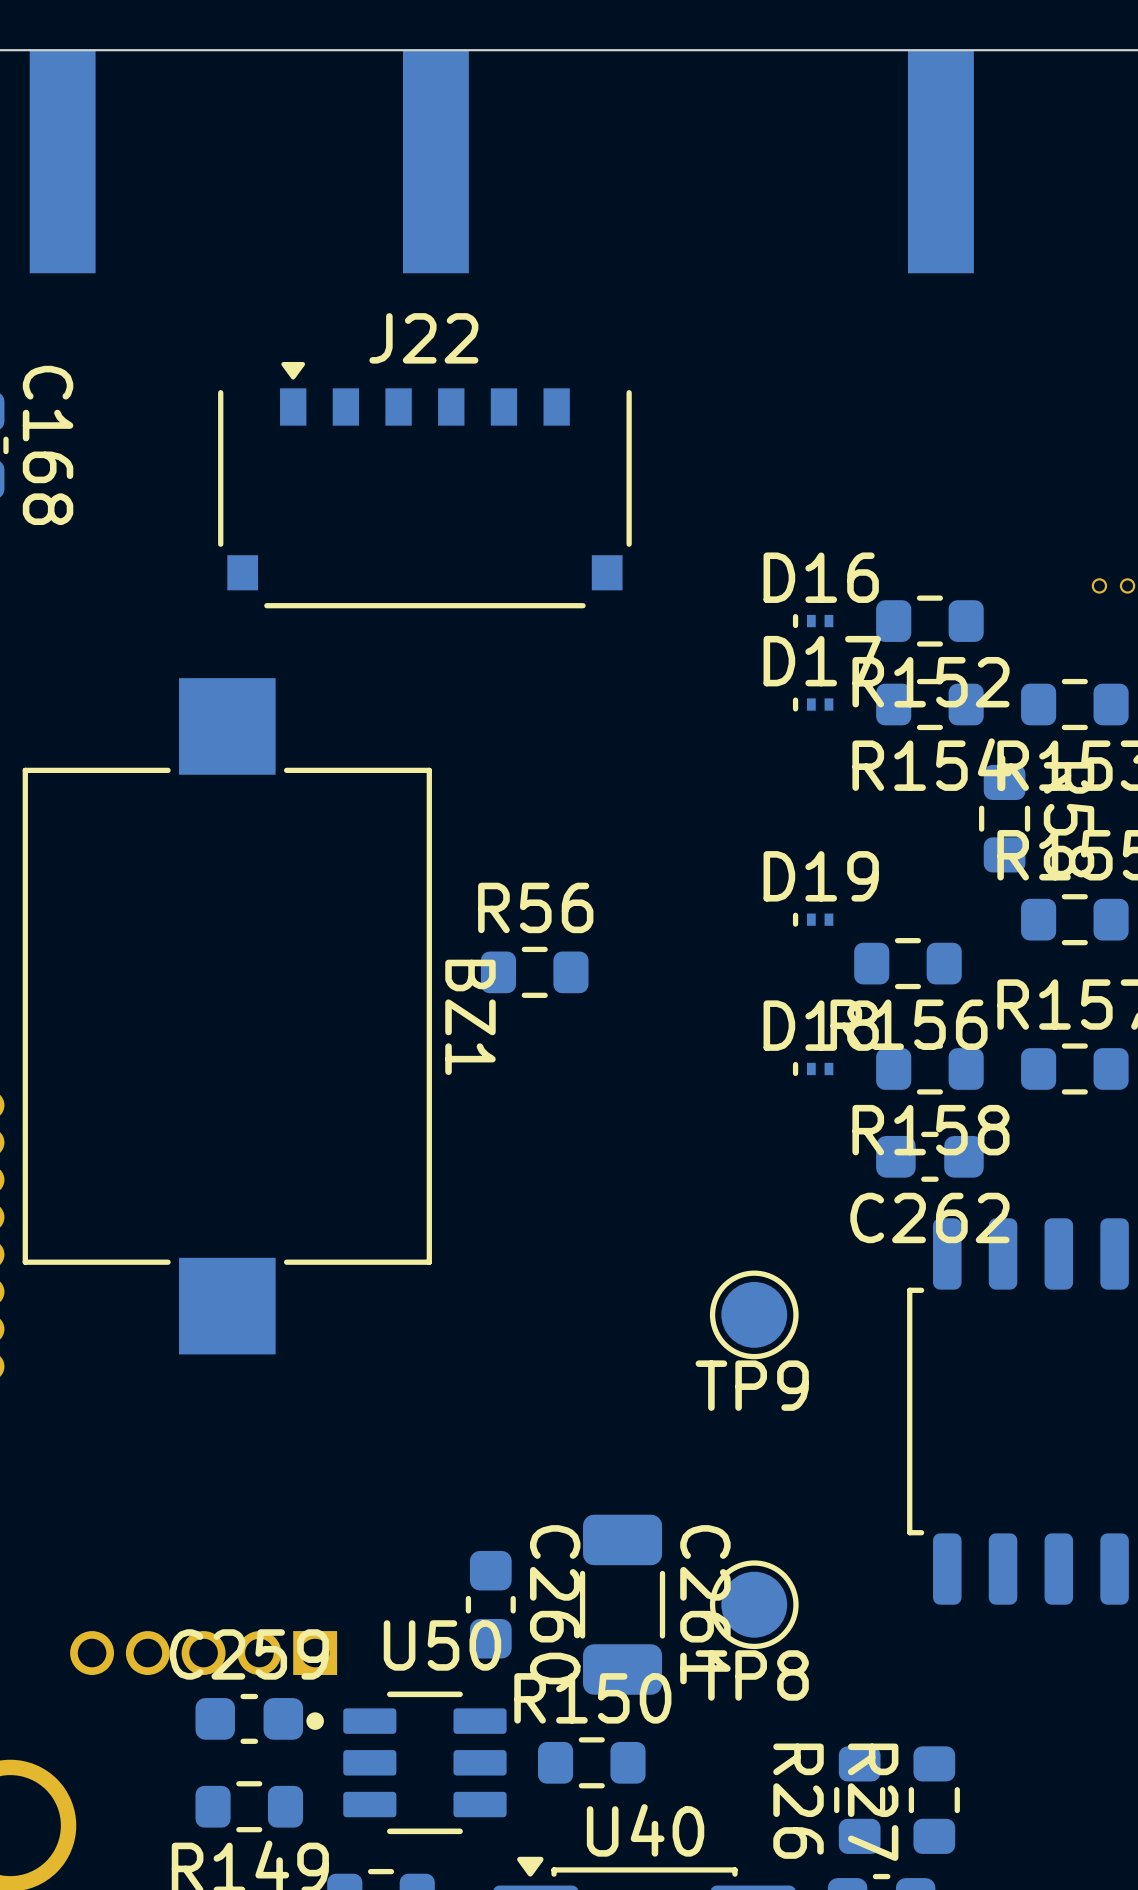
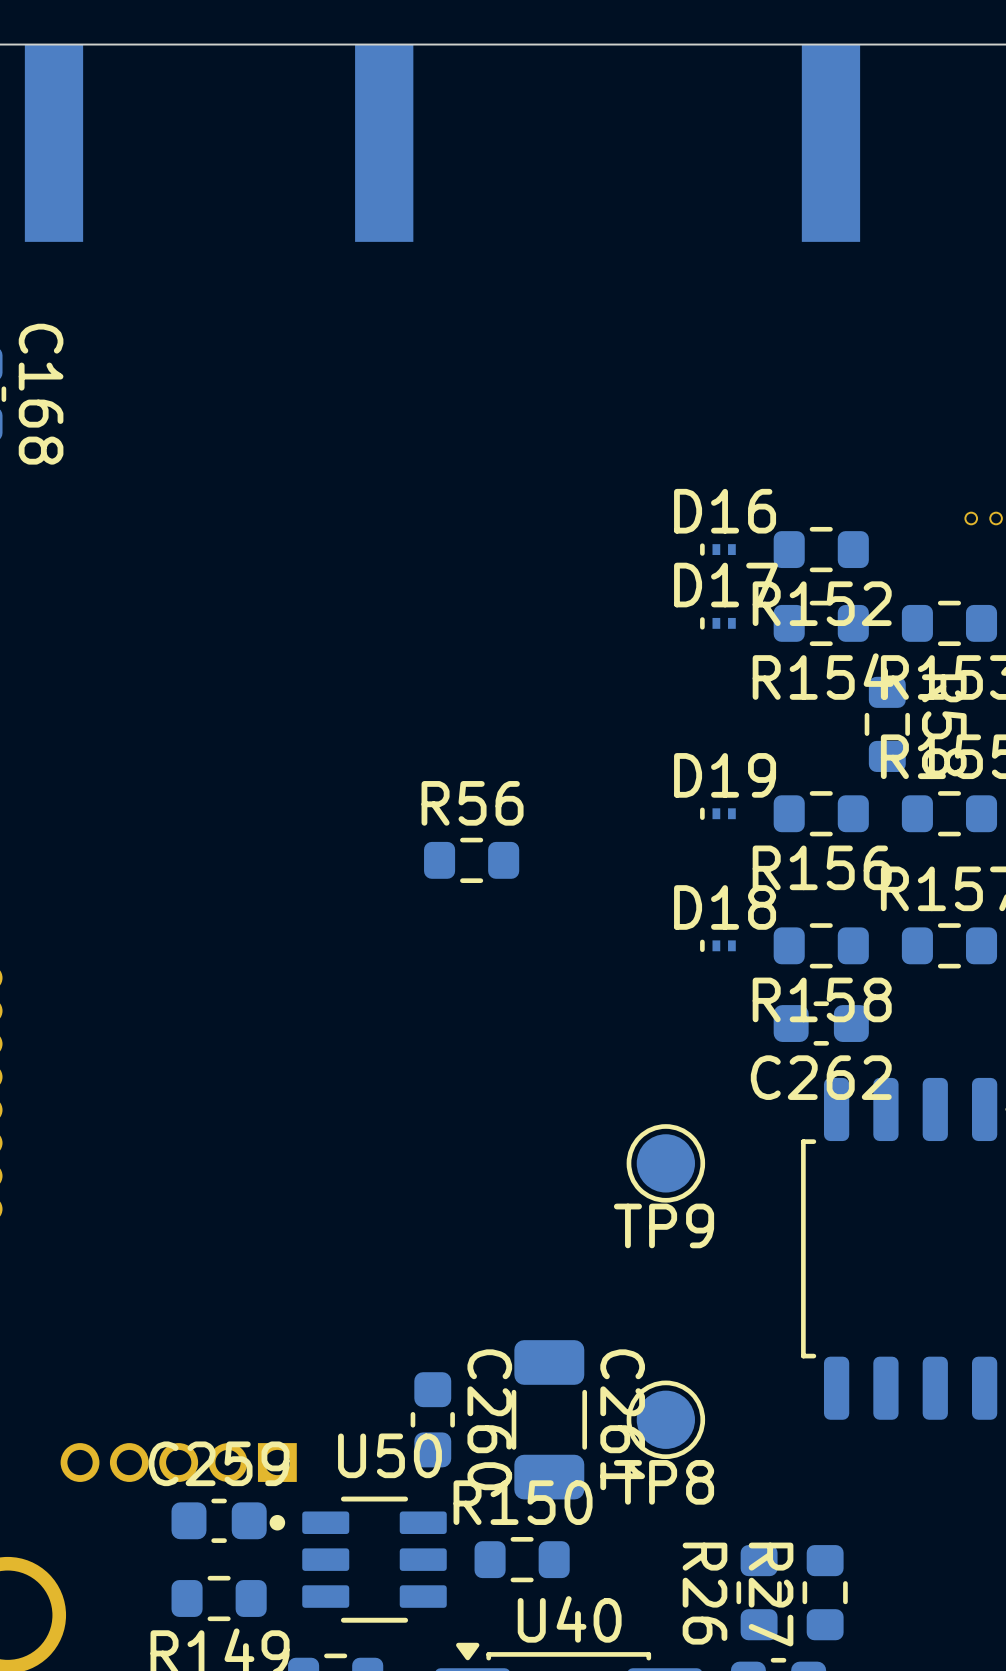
J22: (424, 485) -> none
R156 position: (907, 963) -> (821, 813)
BZ1: (227, 1016) -> none

